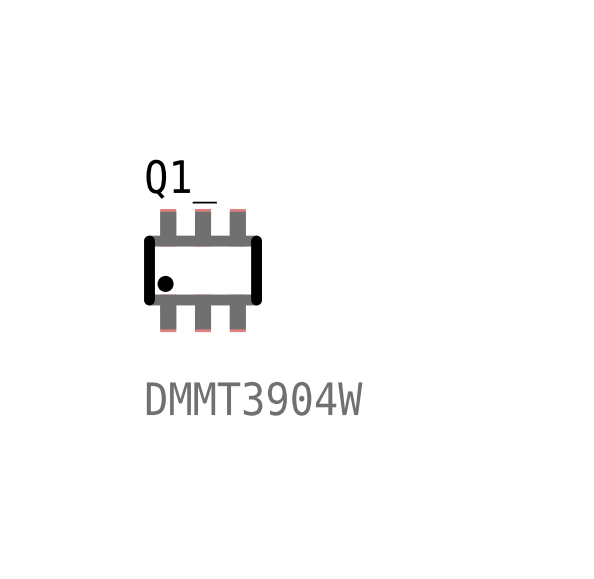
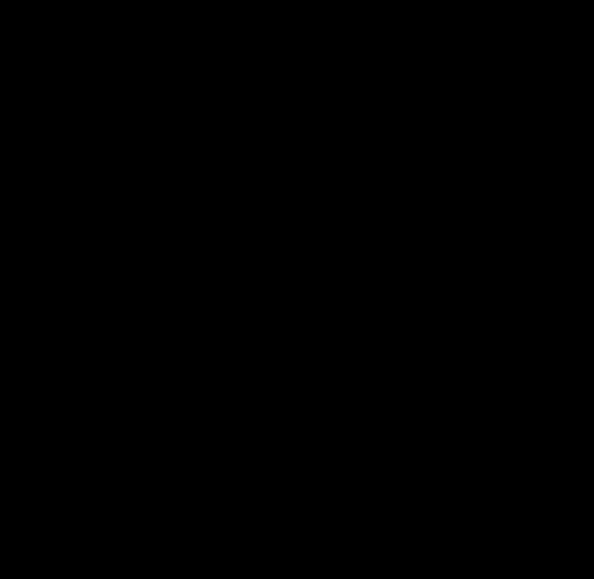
Q1_: DMMT3904W (203, 270) -> none

